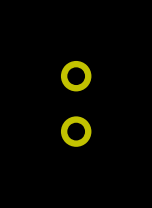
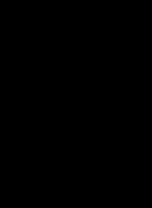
part: (76, 103) -> none

